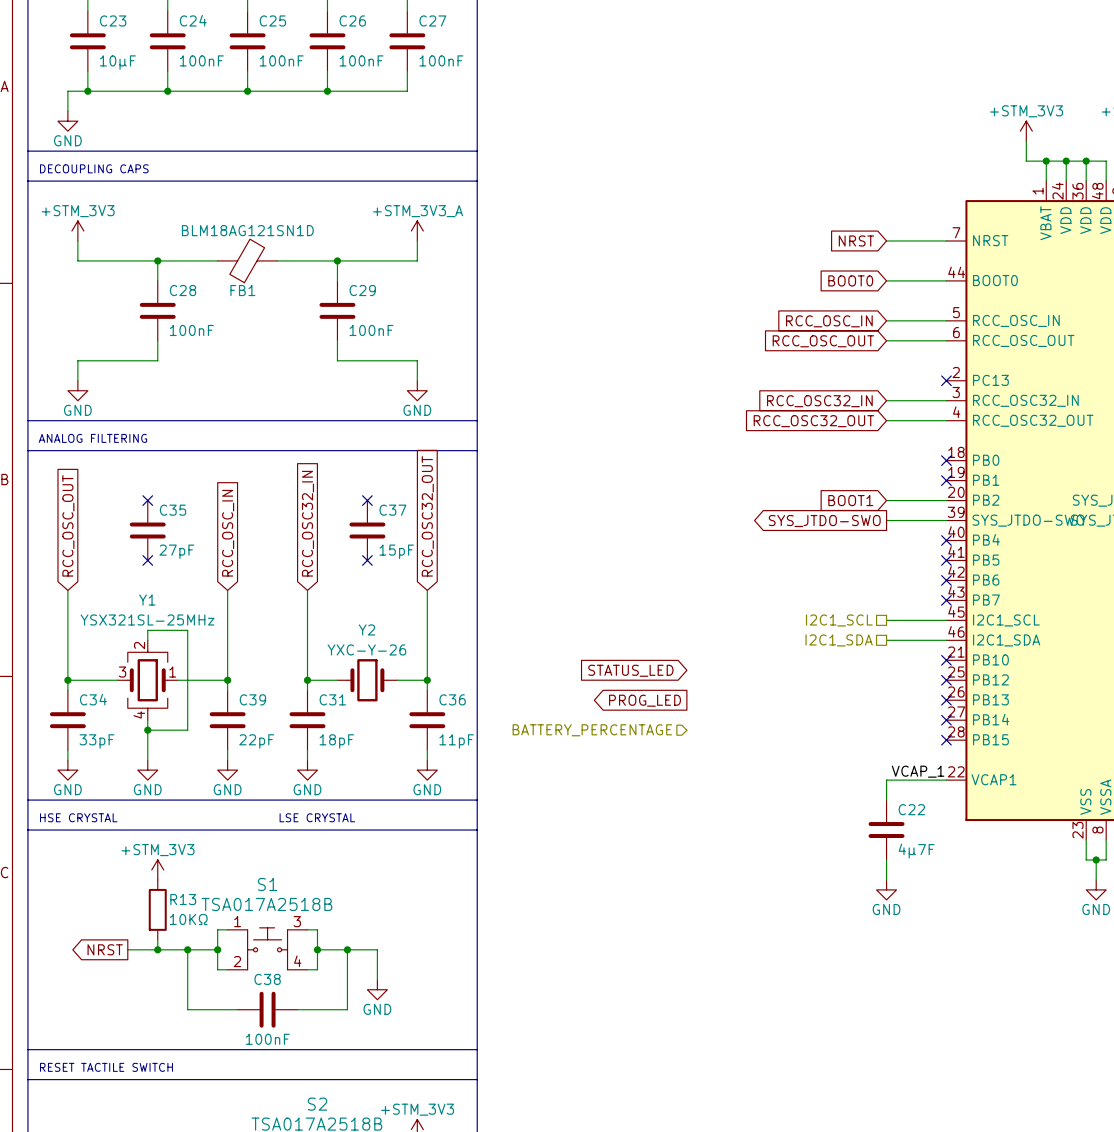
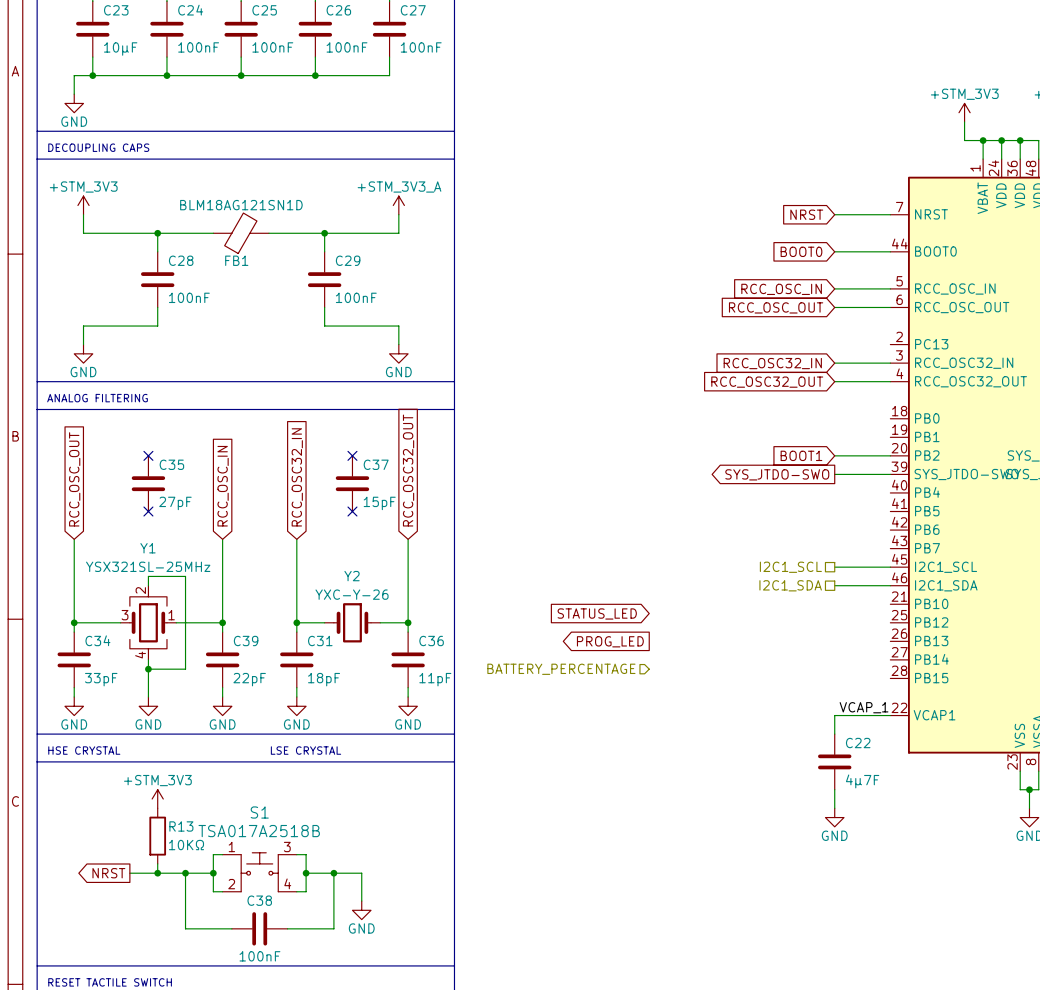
no-connect mark: (946, 380) -> none
no-connect mark: (946, 460) -> none
no-connect mark: (946, 480) -> none
no-connect mark: (946, 540) -> none
no-connect mark: (946, 560) -> none
no-connect mark: (946, 580) -> none
no-connect mark: (946, 600) -> none
no-connect mark: (946, 660) -> none
no-connect mark: (946, 680) -> none
no-connect mark: (946, 700) -> none
no-connect mark: (946, 720) -> none
no-connect mark: (946, 740) -> none

